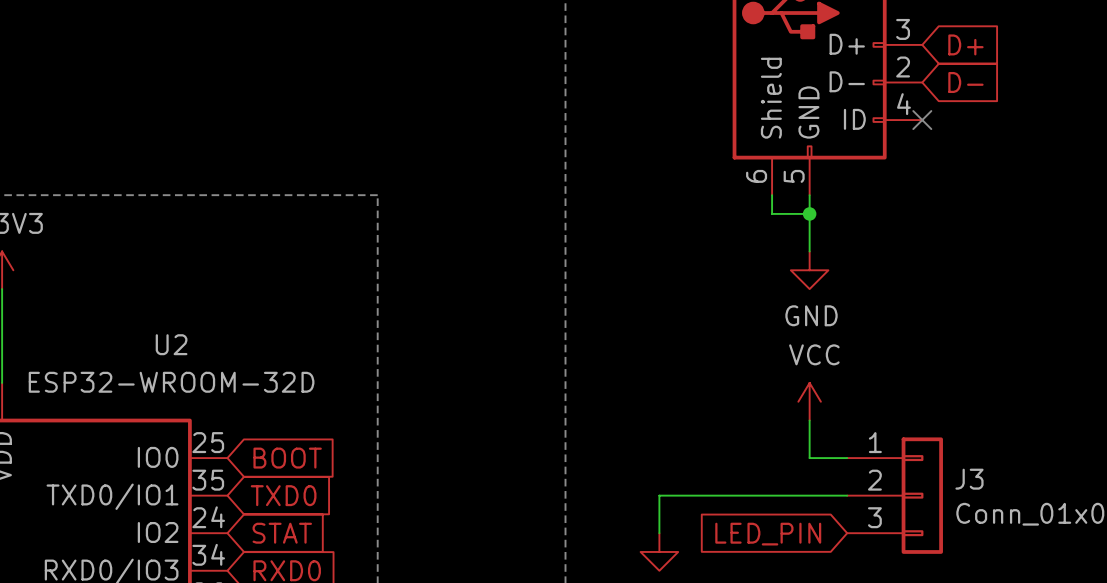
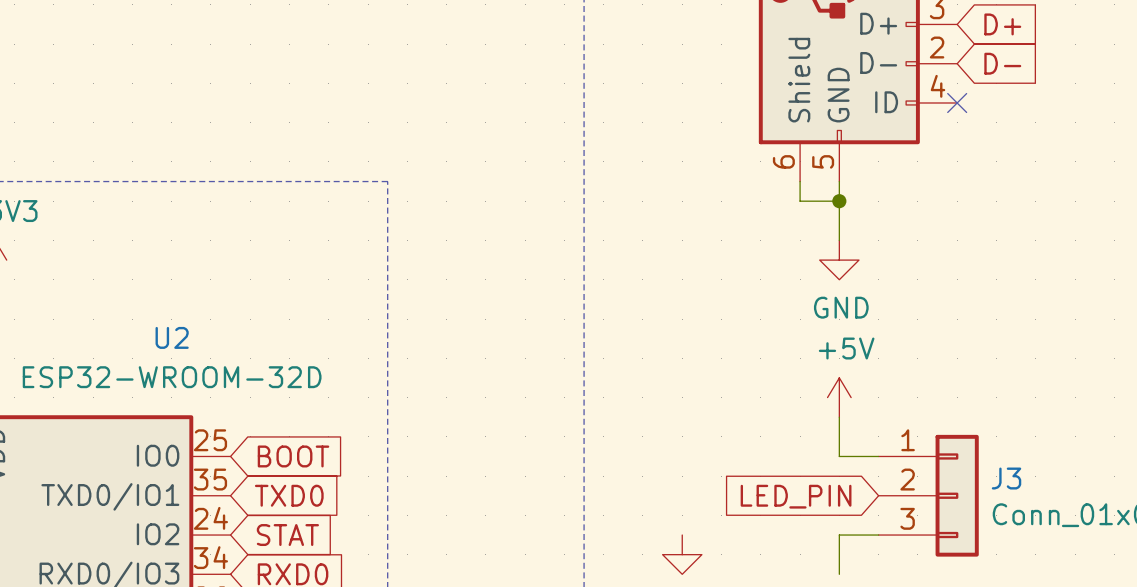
power symbol: VCC (809, 401) -> +5V (839, 397)
wire: (847, 495) (659, 495) (659, 533) -> none
wire: none -> (878, 535) (839, 535) (839, 574)
global label position: LED_PIN (768, 534) -> LED_PIN (796, 496)

